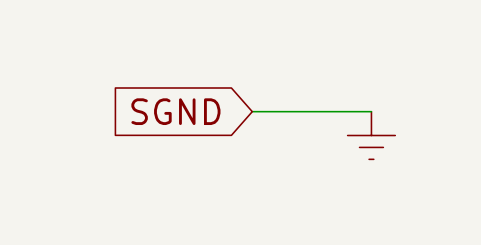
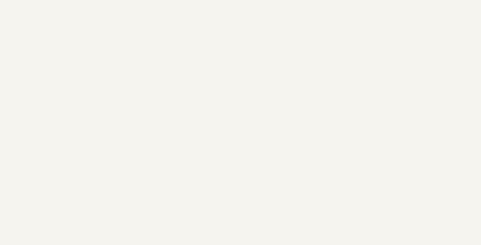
global label: SGND (175, 111) -> none
wire: (252, 111) (371, 111) -> none
power symbol: (371, 135) -> none

